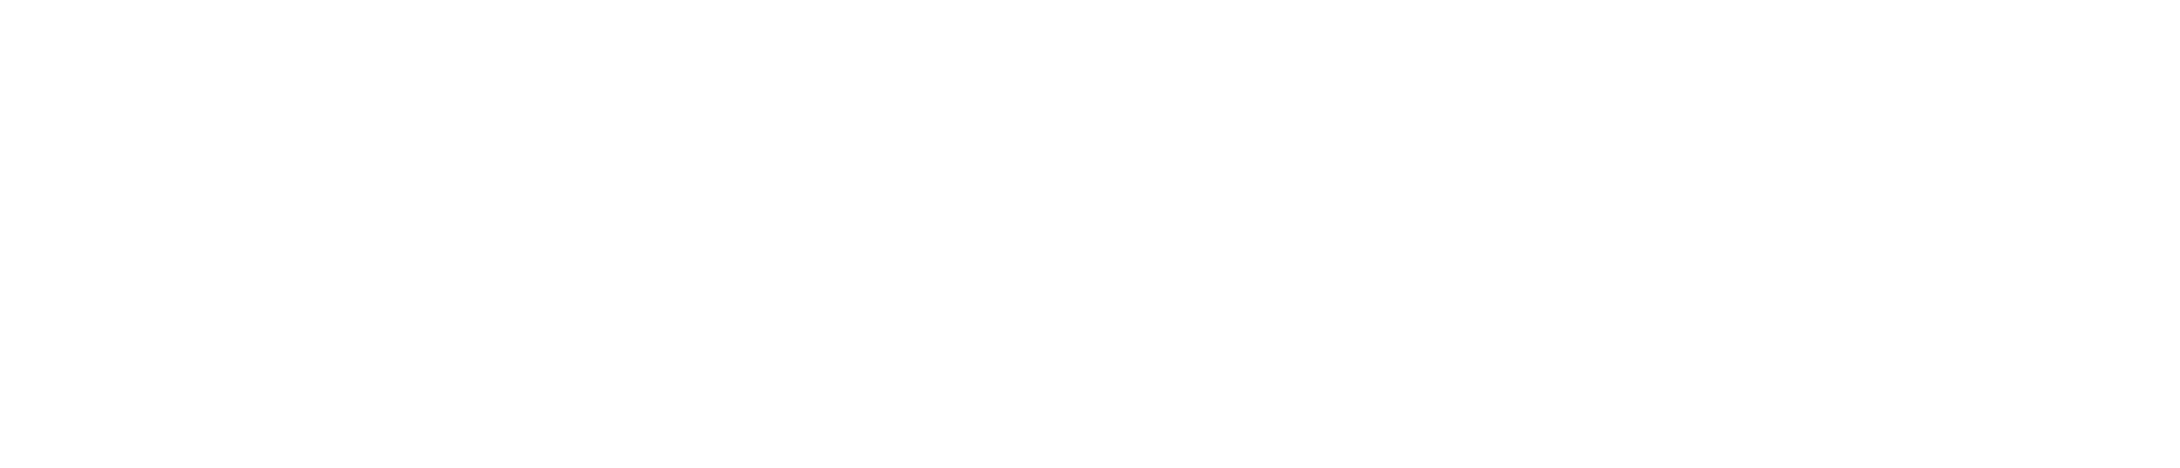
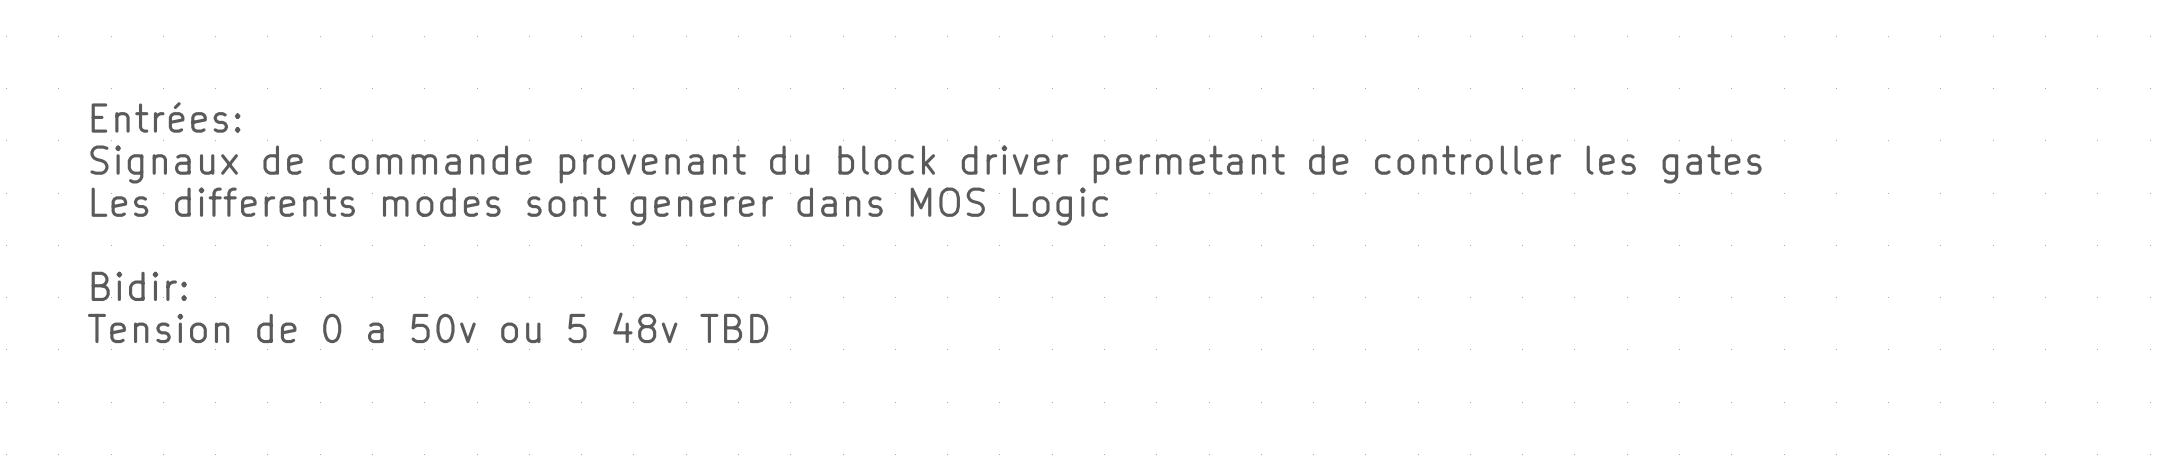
text: none -> Entrées: (166, 117)
text: none -> Signaux de commande provenant du block driver permetant de controller les gates (926, 164)
text: none -> Les differents modes sont generer dans MOS Logic (599, 206)
text: none -> Bidir: (139, 286)
text: none -> Tension de 0 a 50v ou 5 48v TBD (428, 327)

